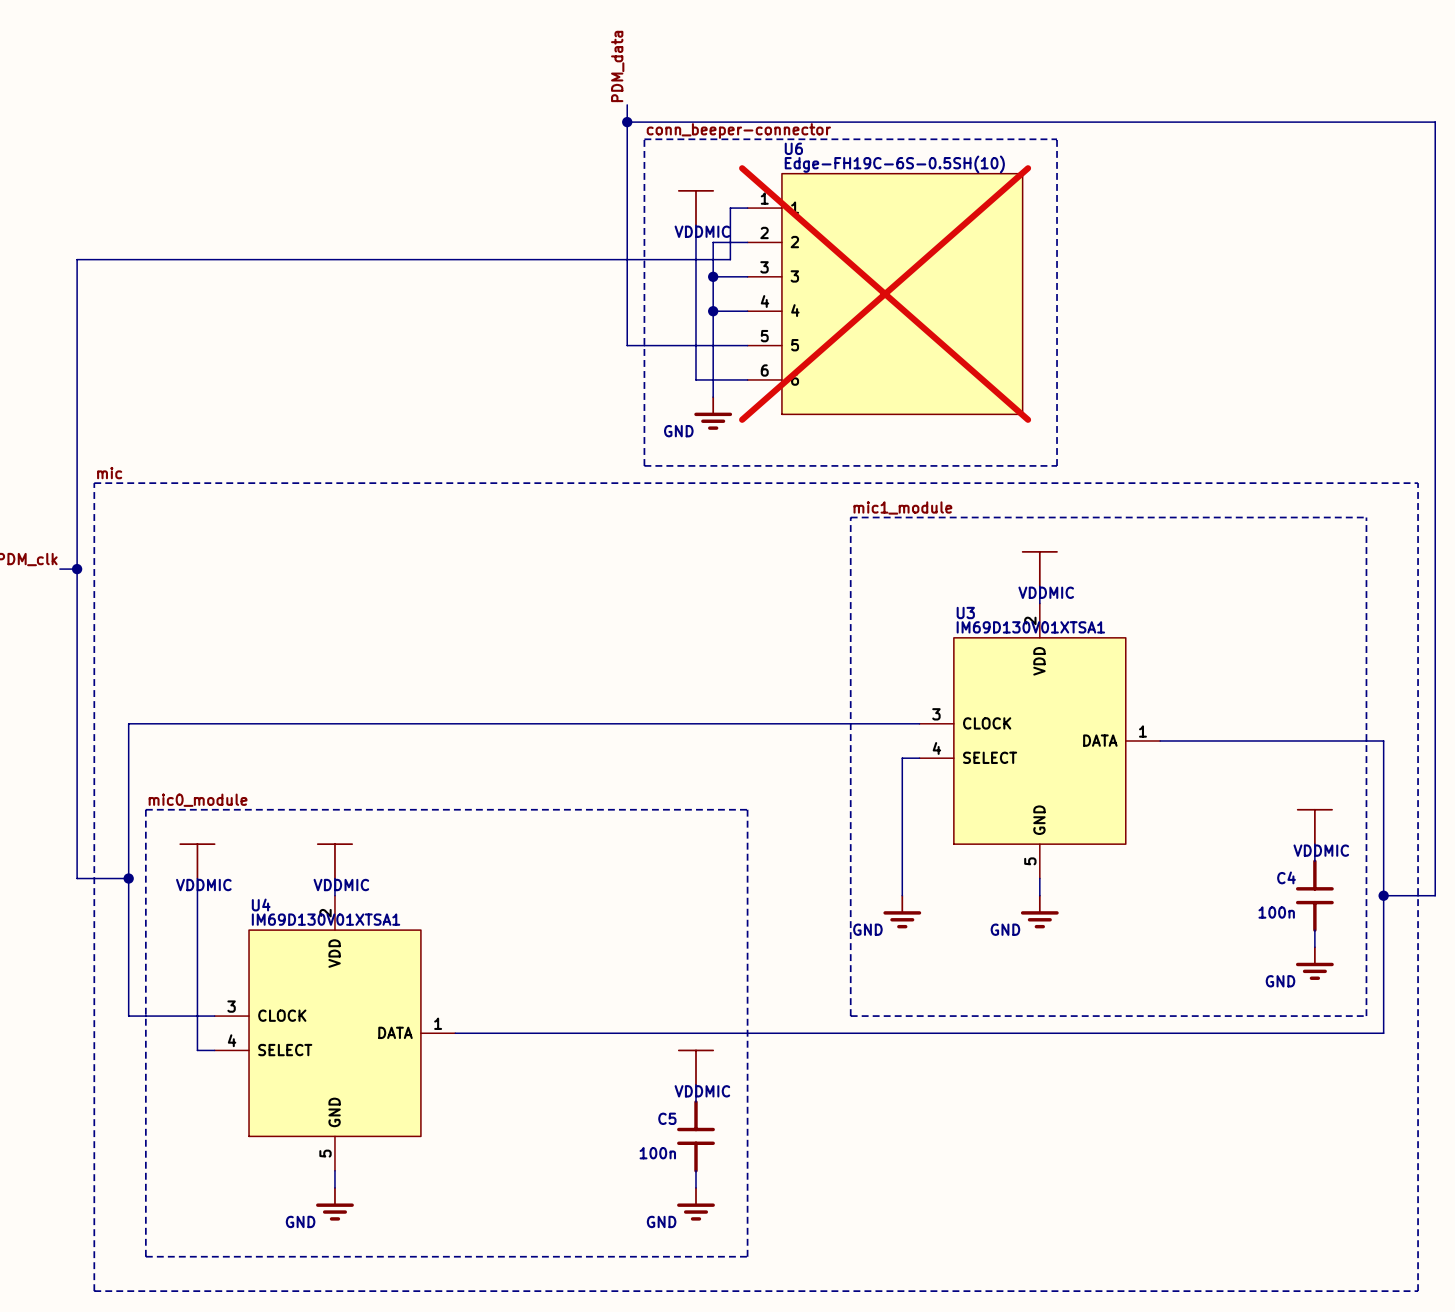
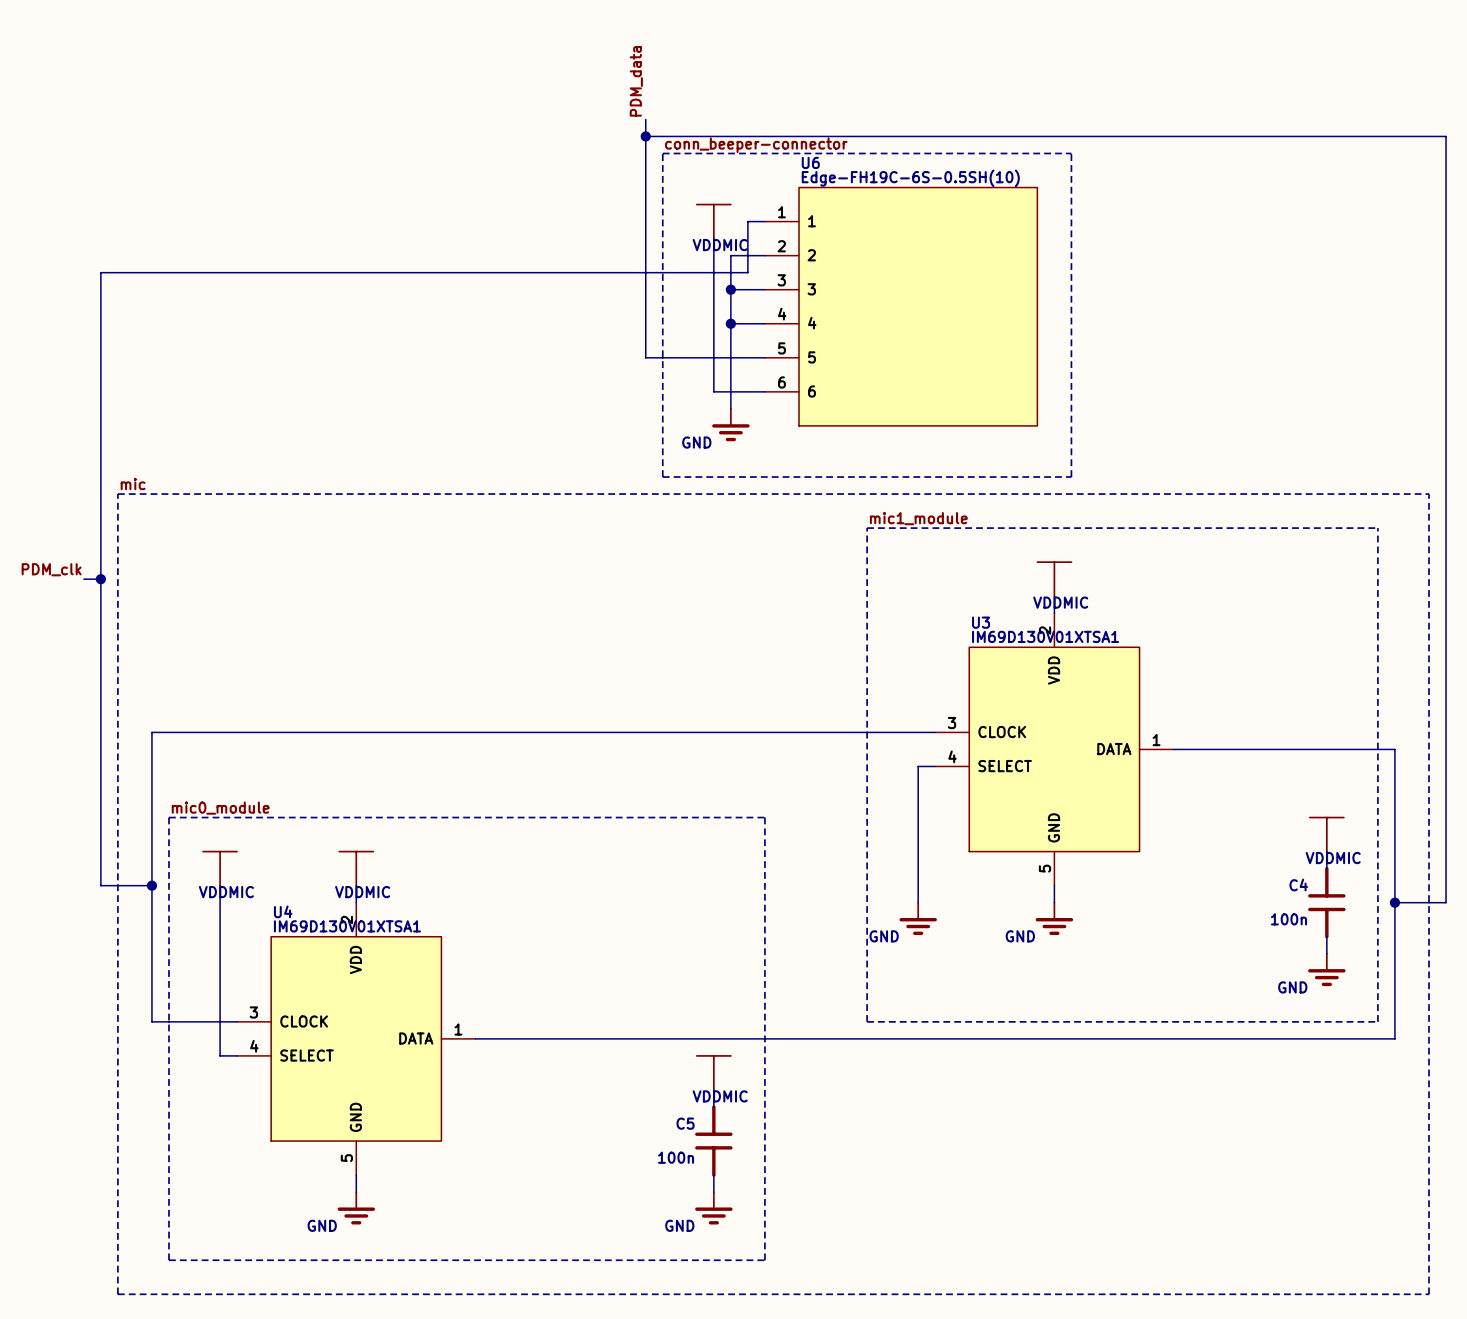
U6 do-not-place cross: (885, 294) -> none

